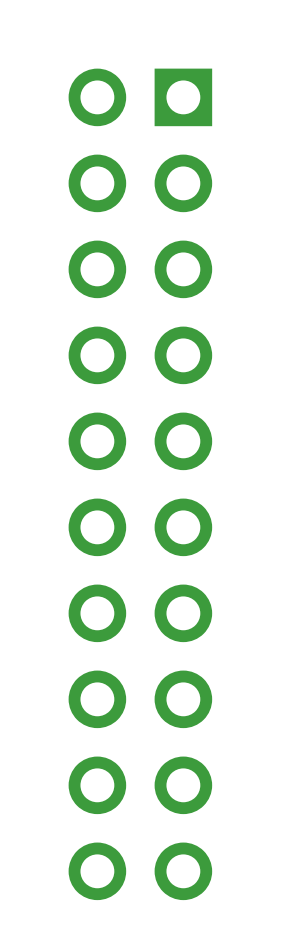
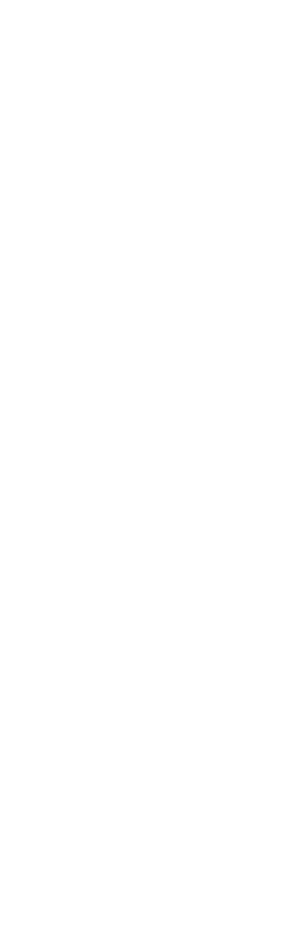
part: (140, 484) -> none

